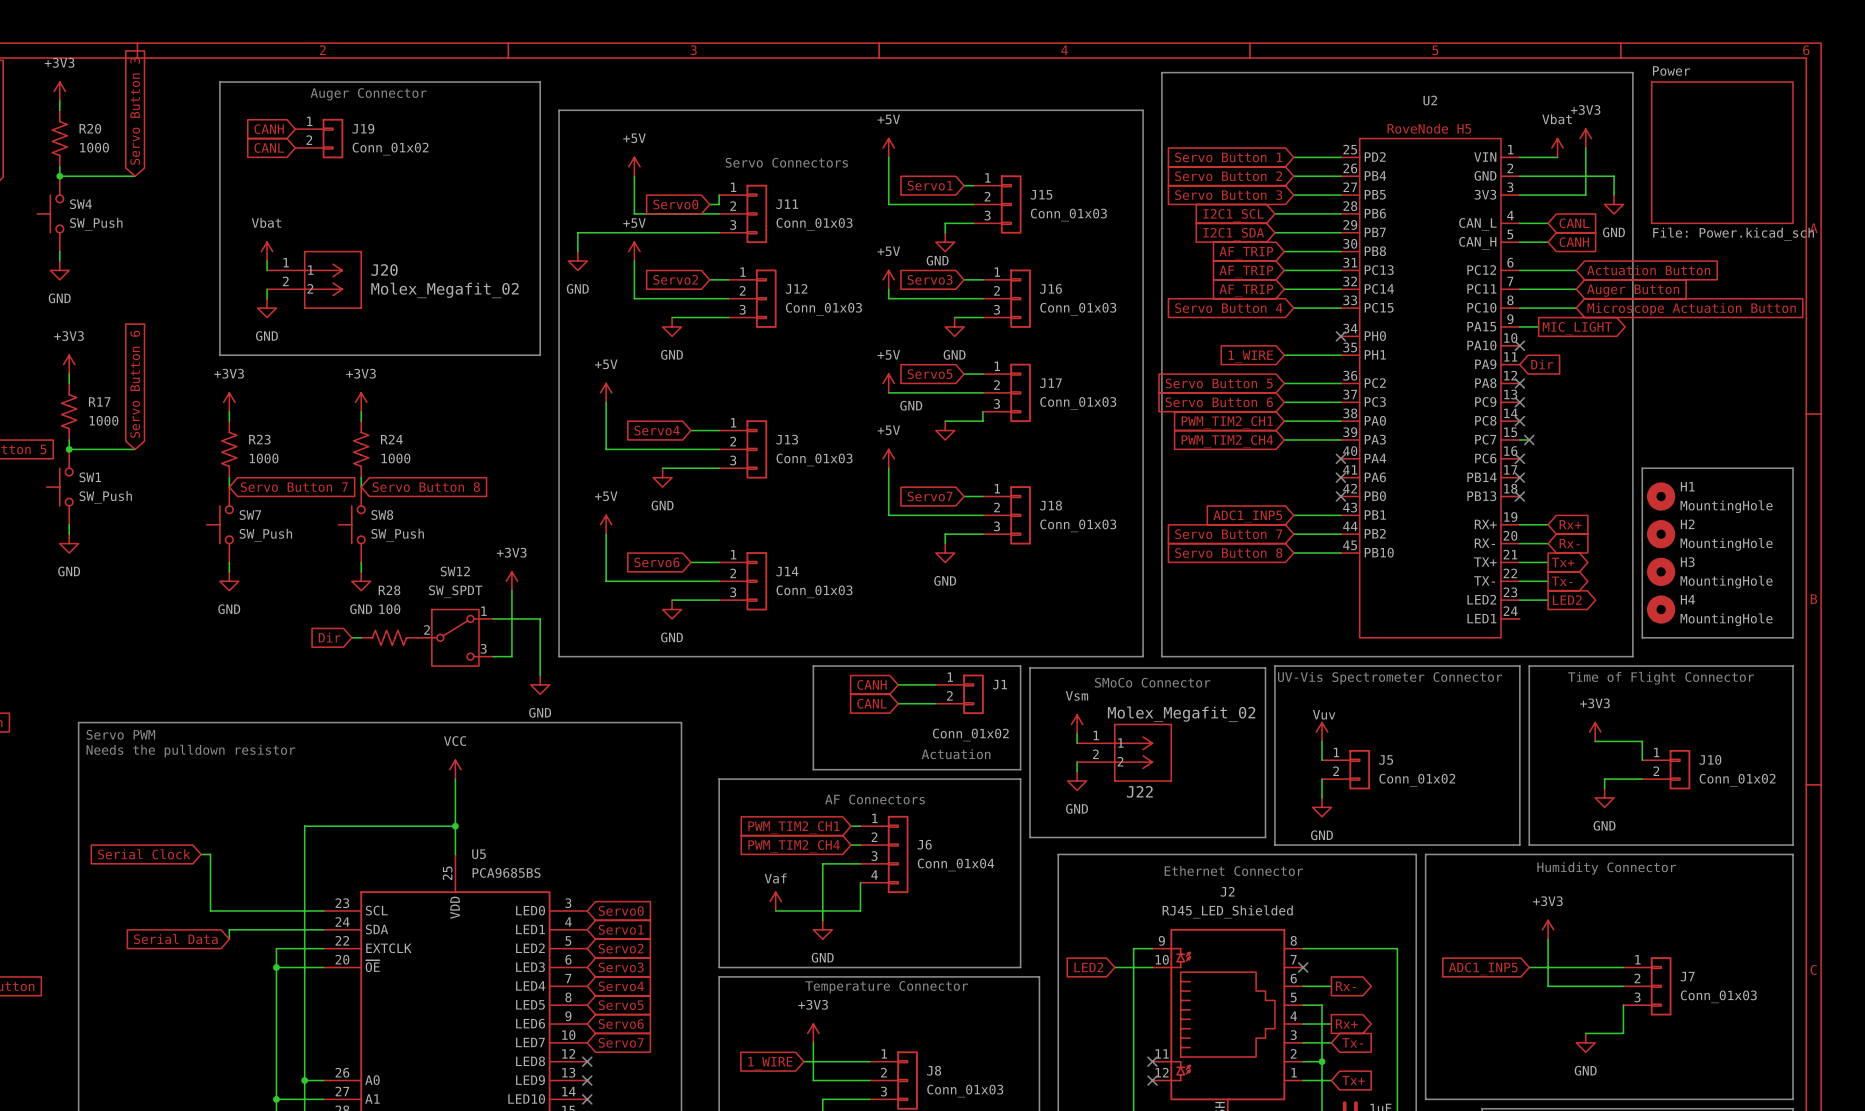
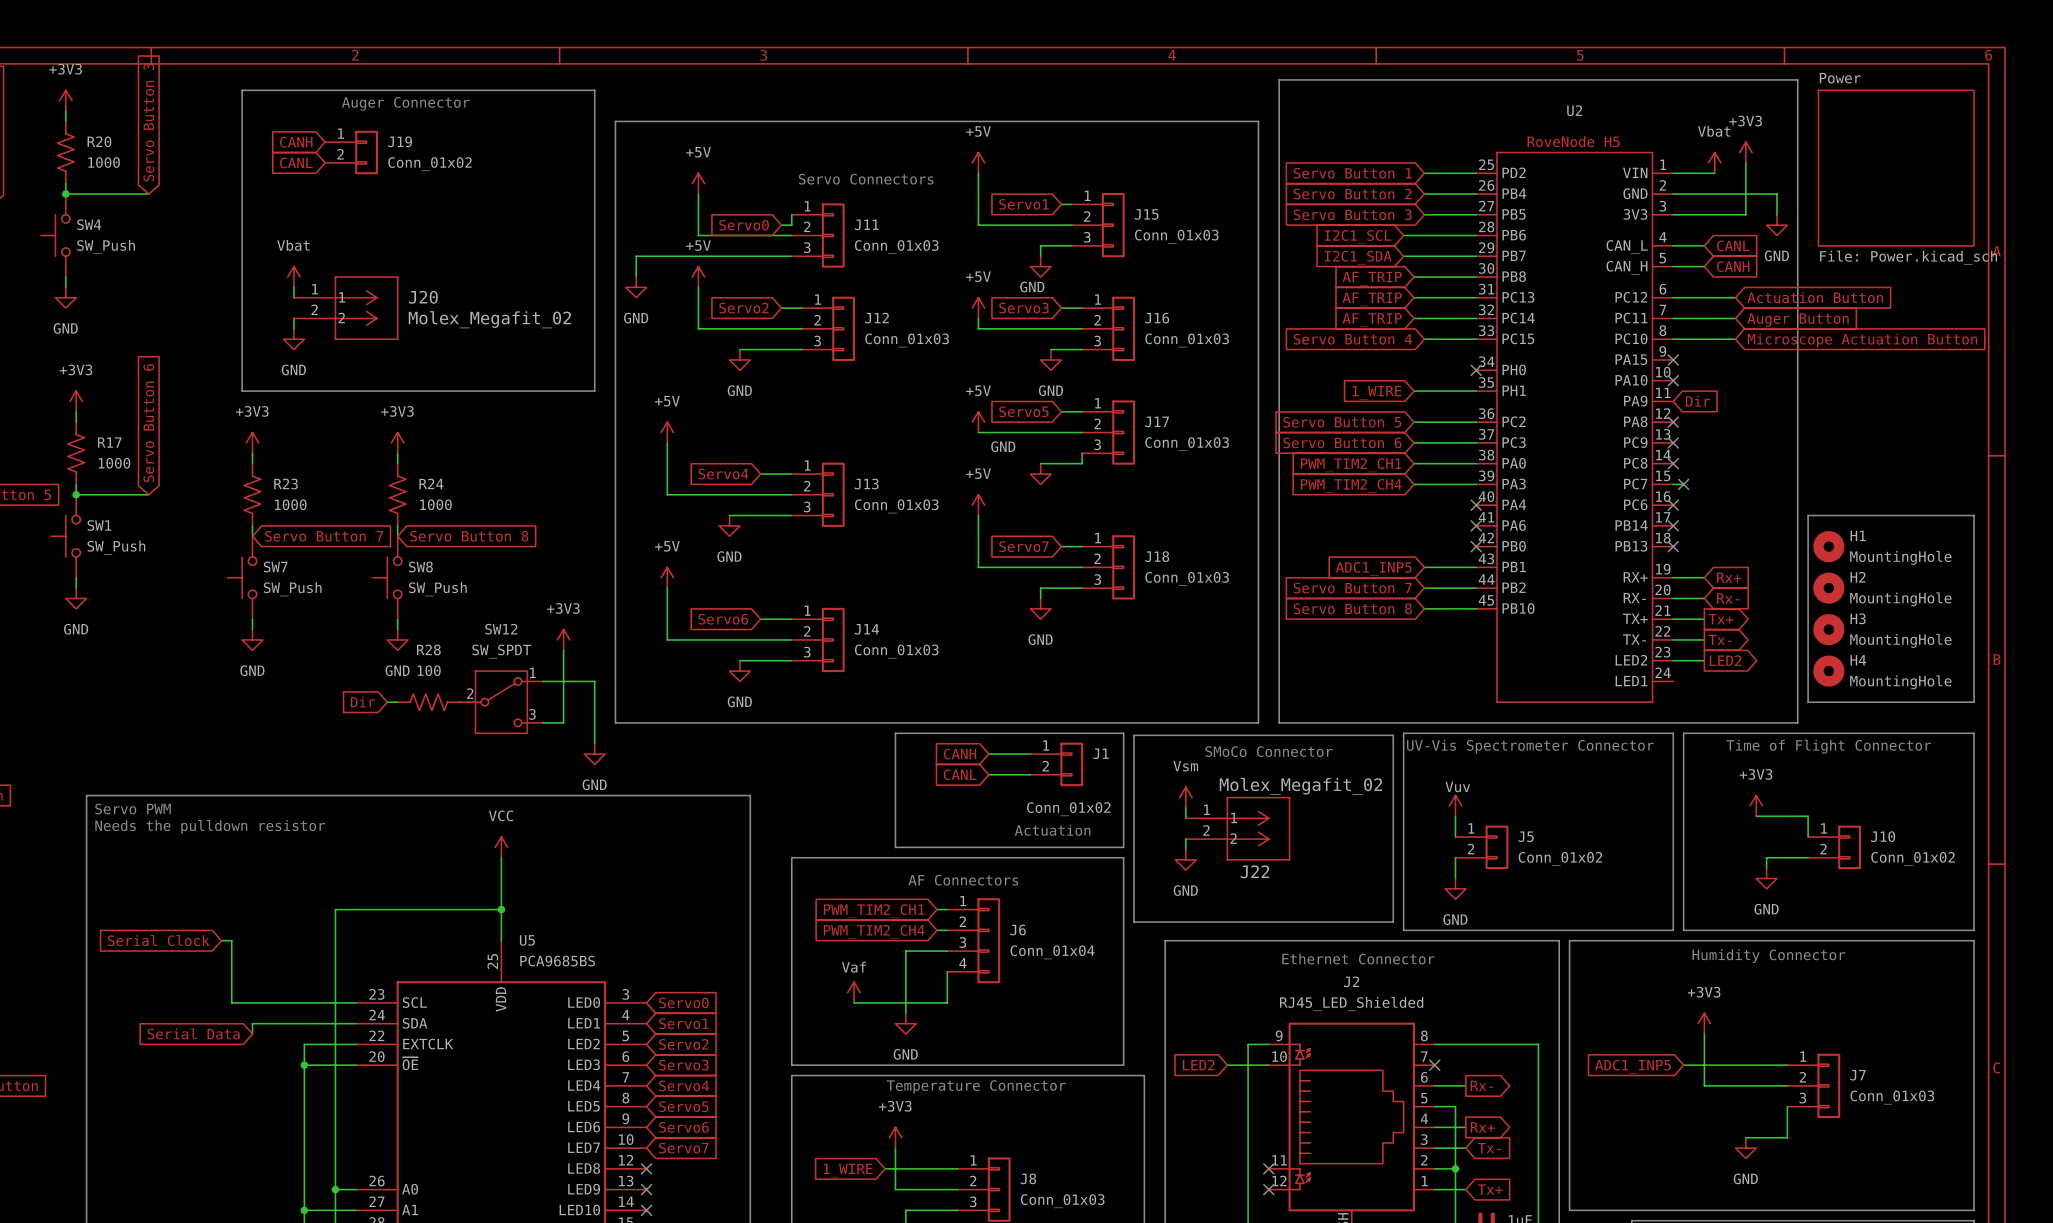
wire: (1519, 326) (1538, 326) -> none
no-connect mark: none -> (1673, 359)
global label: MIC_LIGHT (1577, 328) -> none

